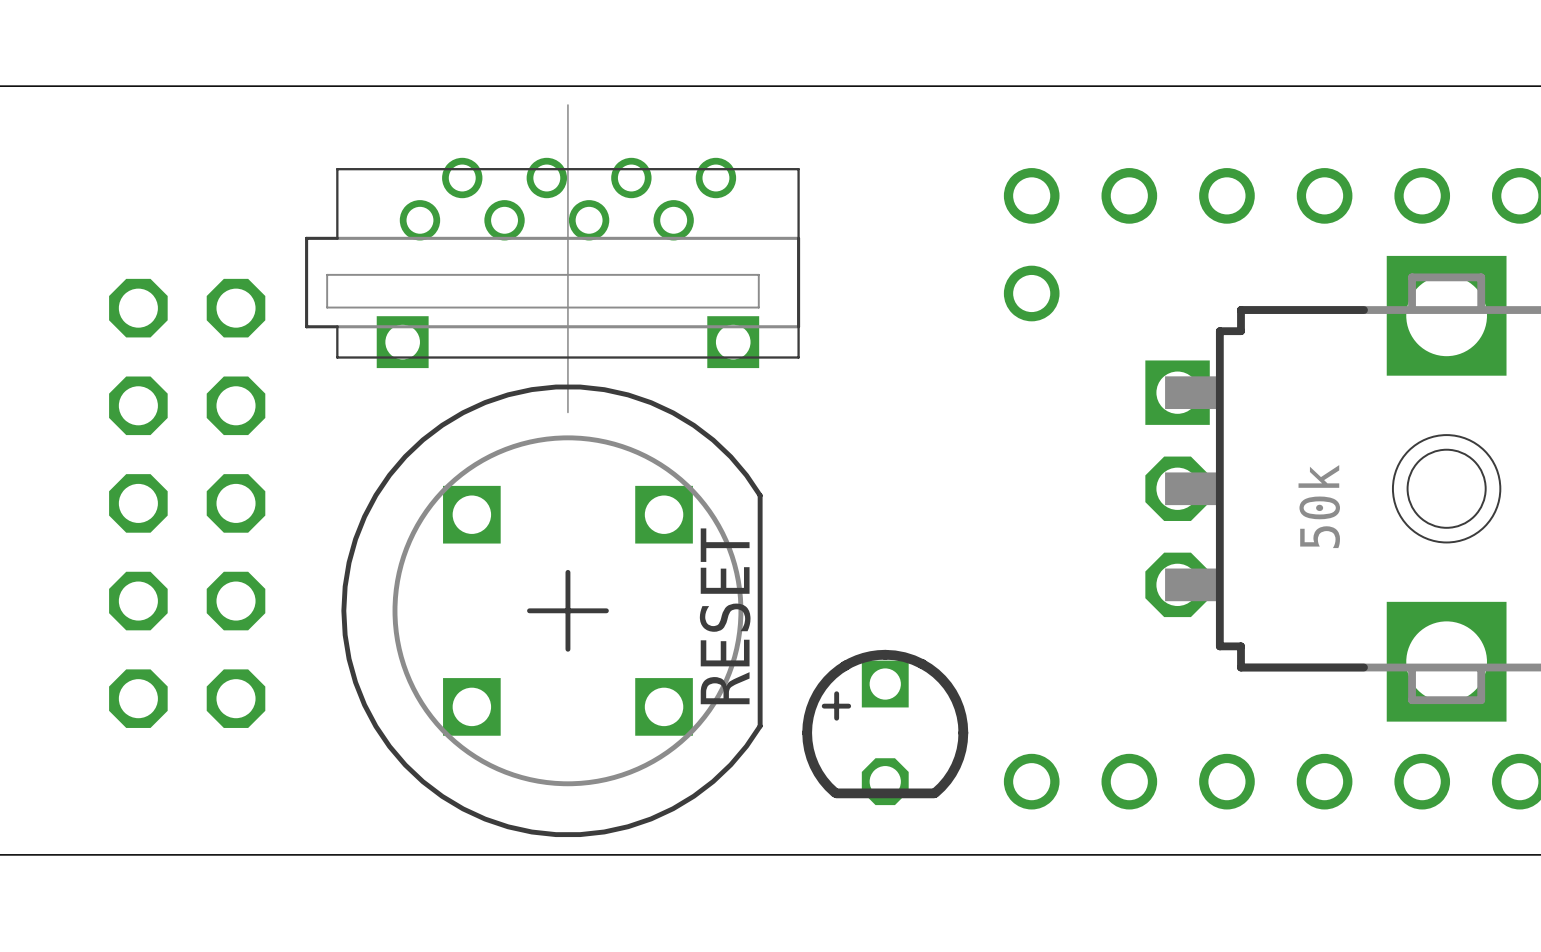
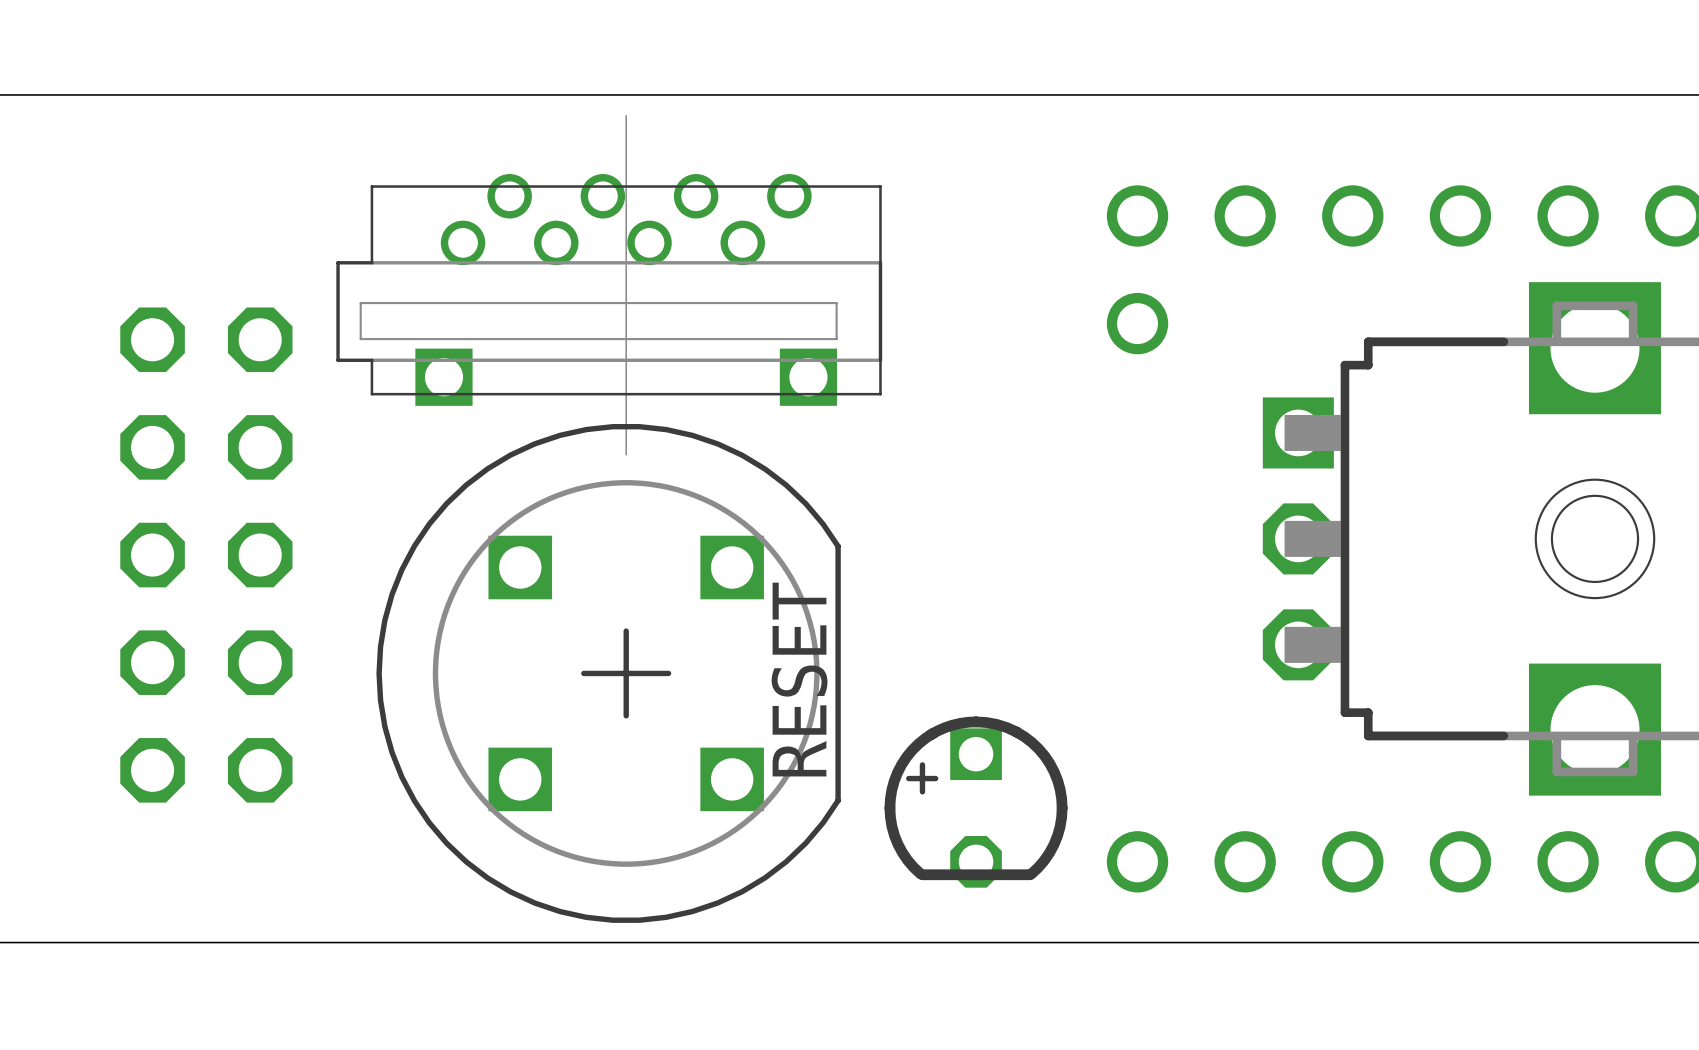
part value: 50k (1319, 506) -> none

